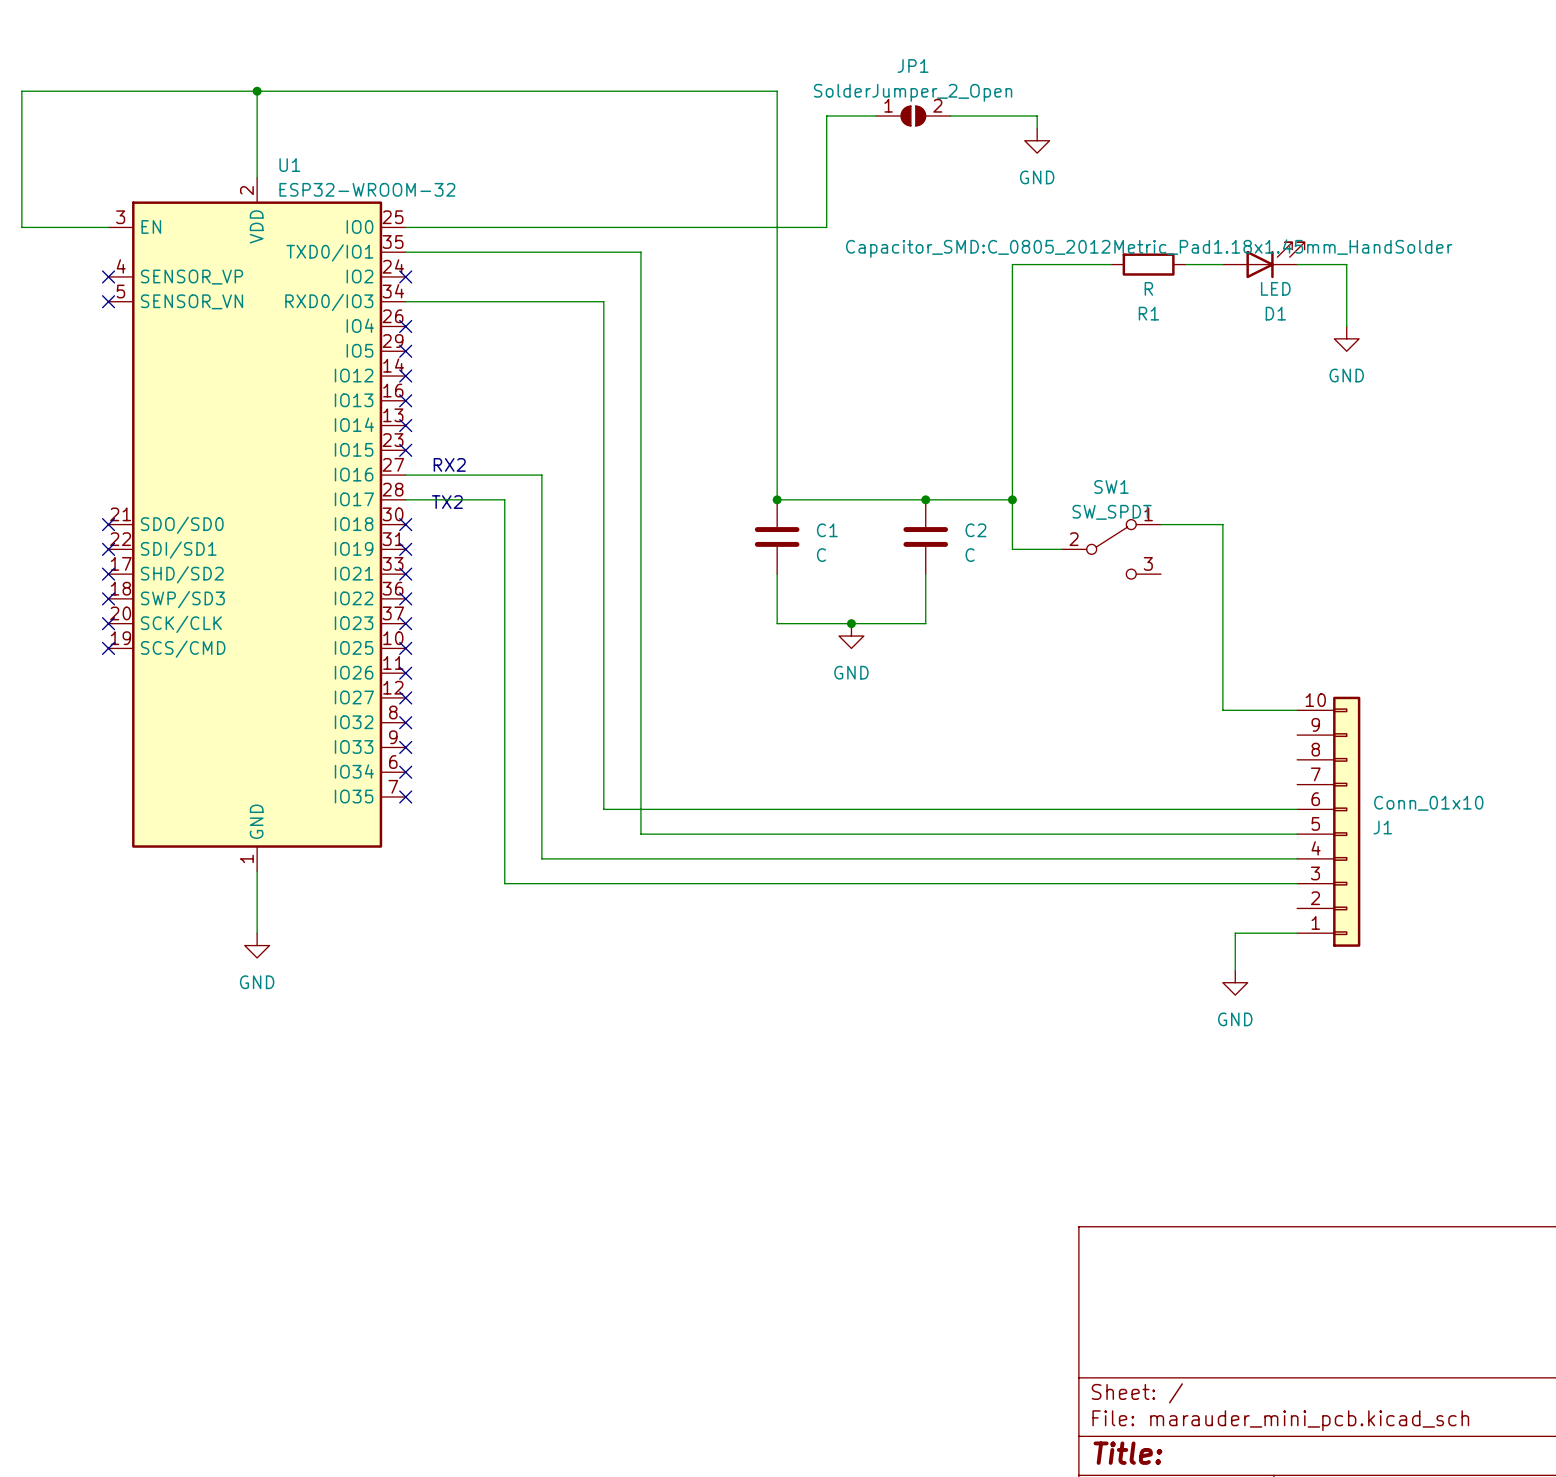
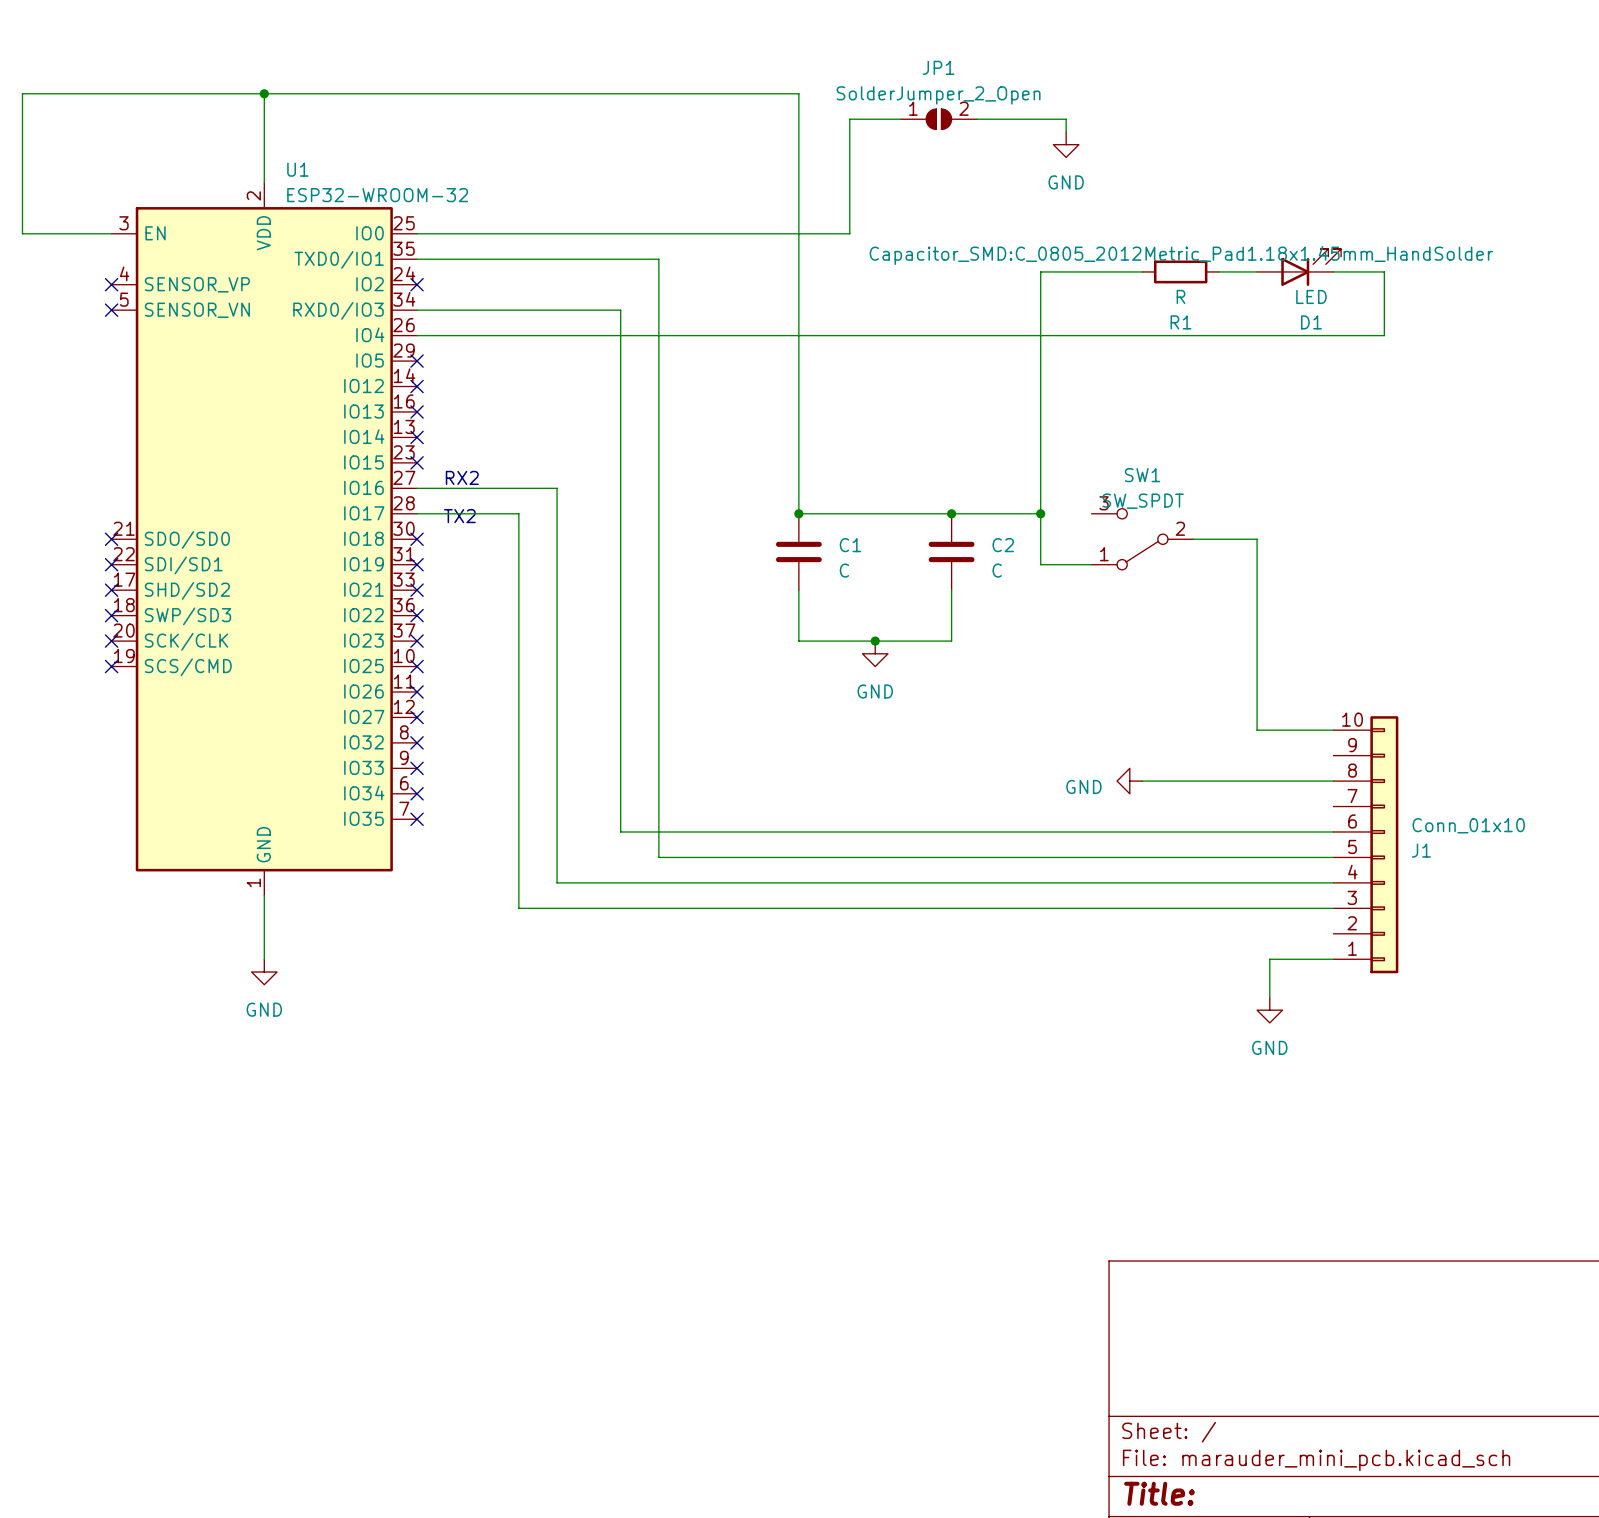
wire: none -> (417, 335) (1384, 335)
no-connect mark: (405, 326) -> none
power symbol: GND (1346, 338) -> none
SW1 rotation: 0° (1111, 549) -> 180° (1142, 539)
power symbol: none -> GND (1129, 781)
wire: none -> (1142, 781) (1333, 781)

